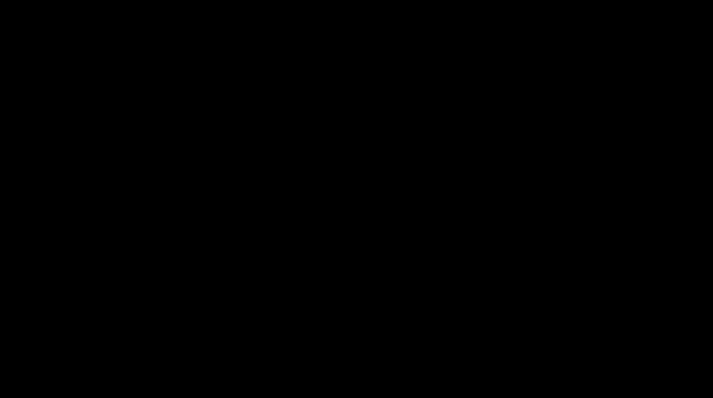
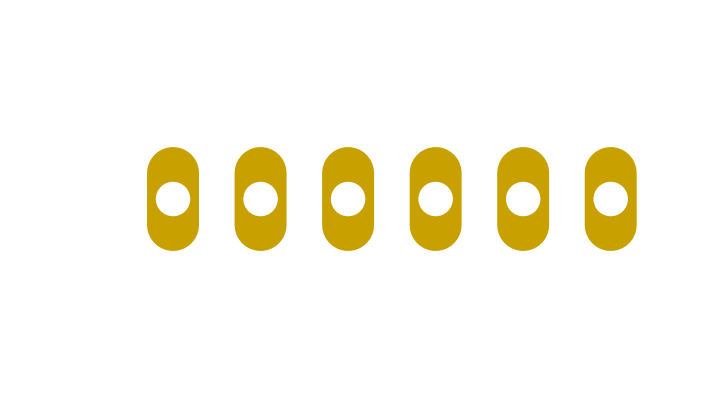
part: none -> (391, 199)

